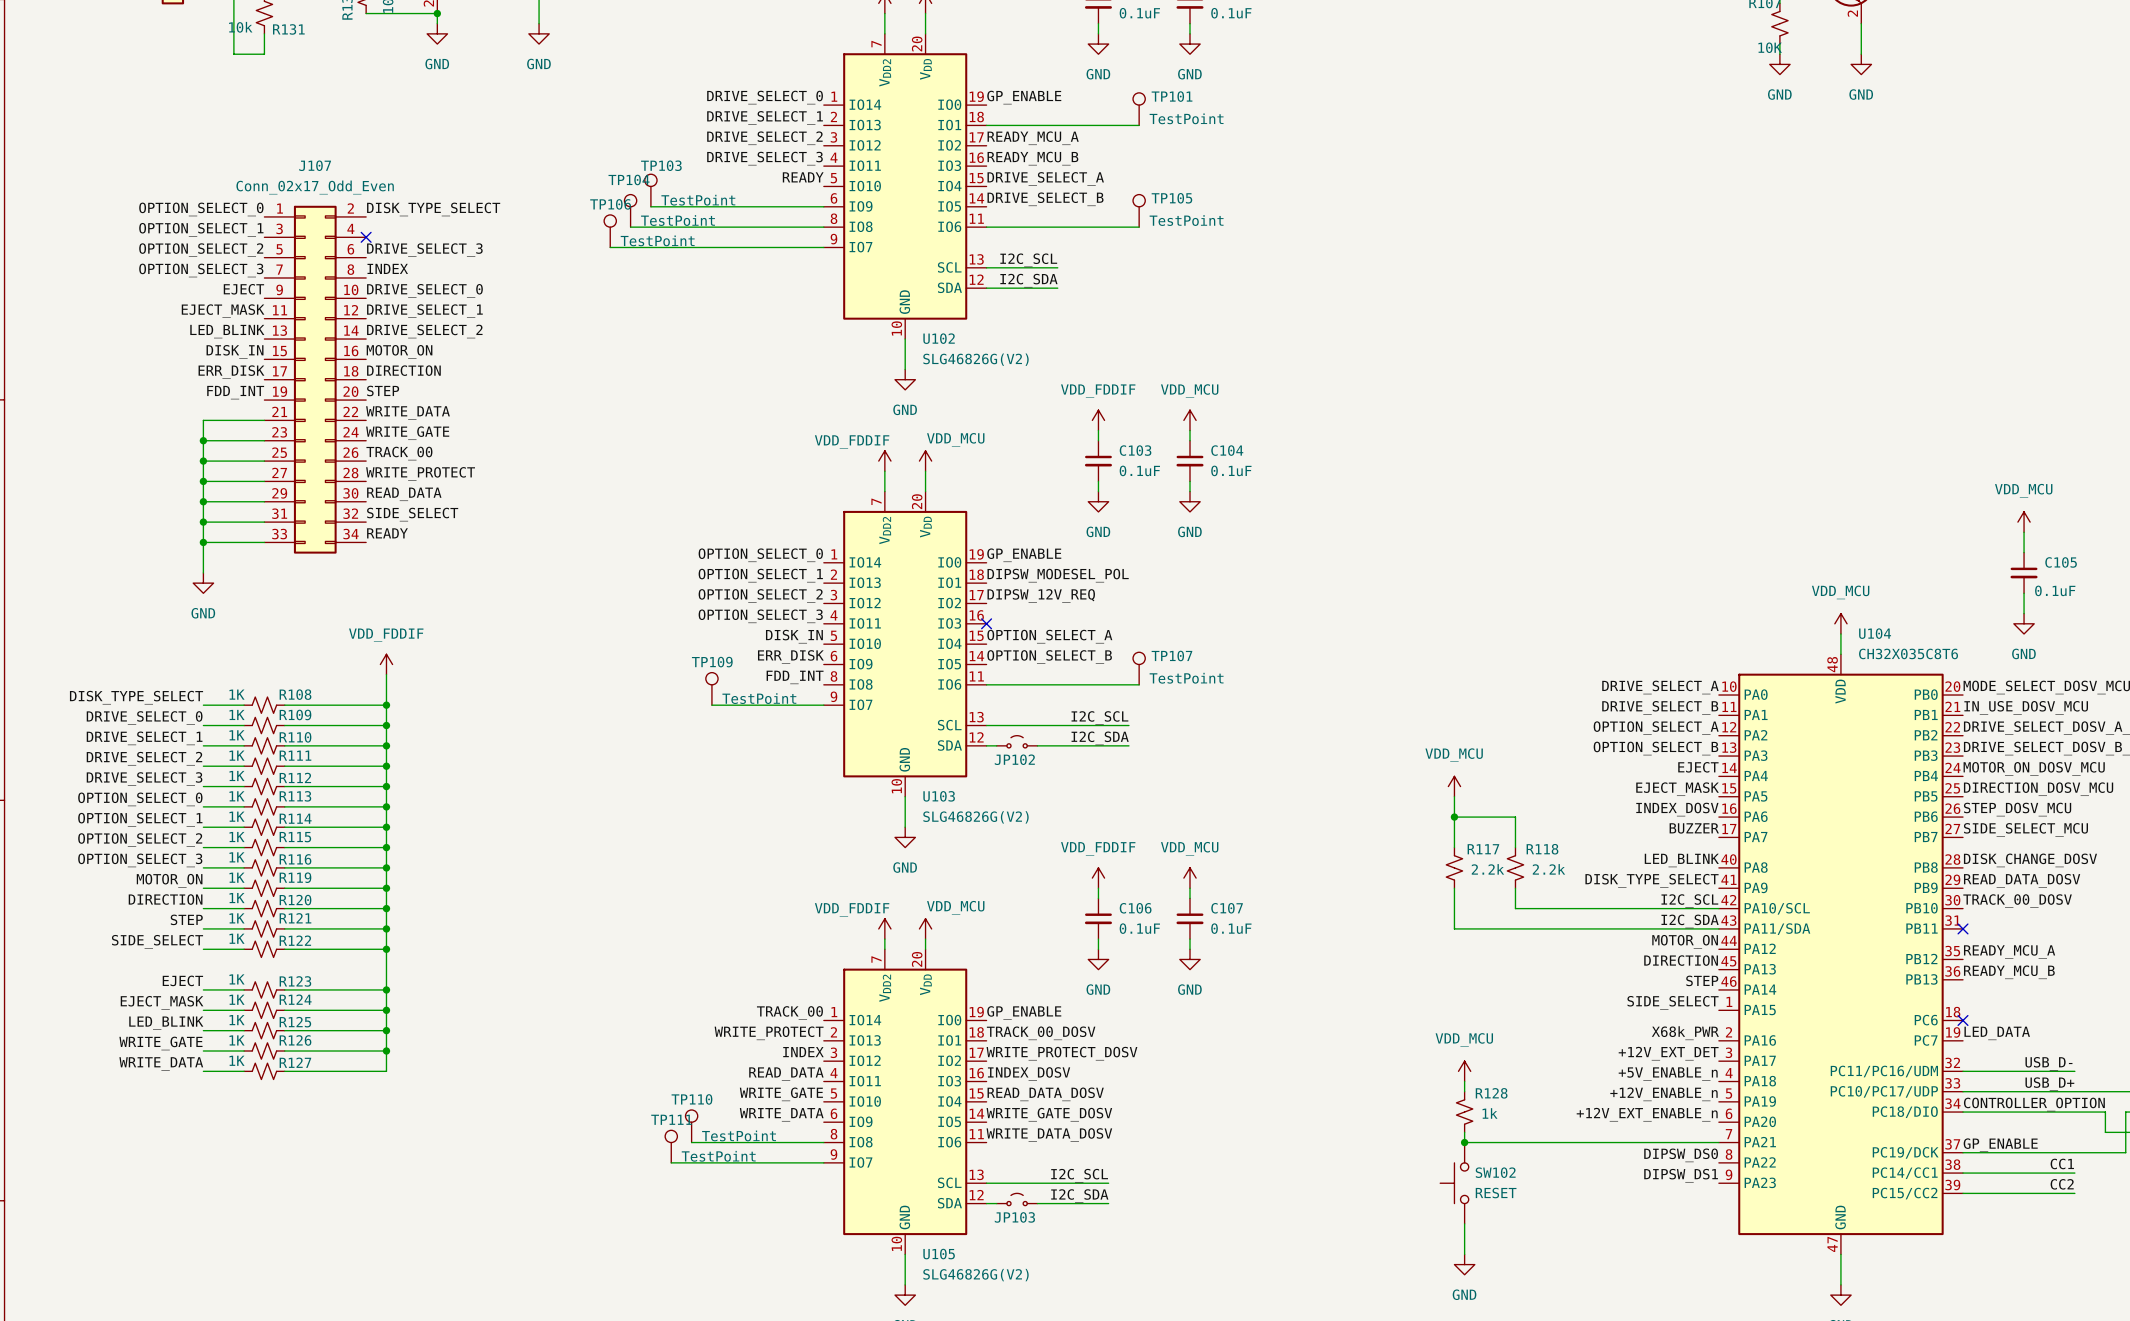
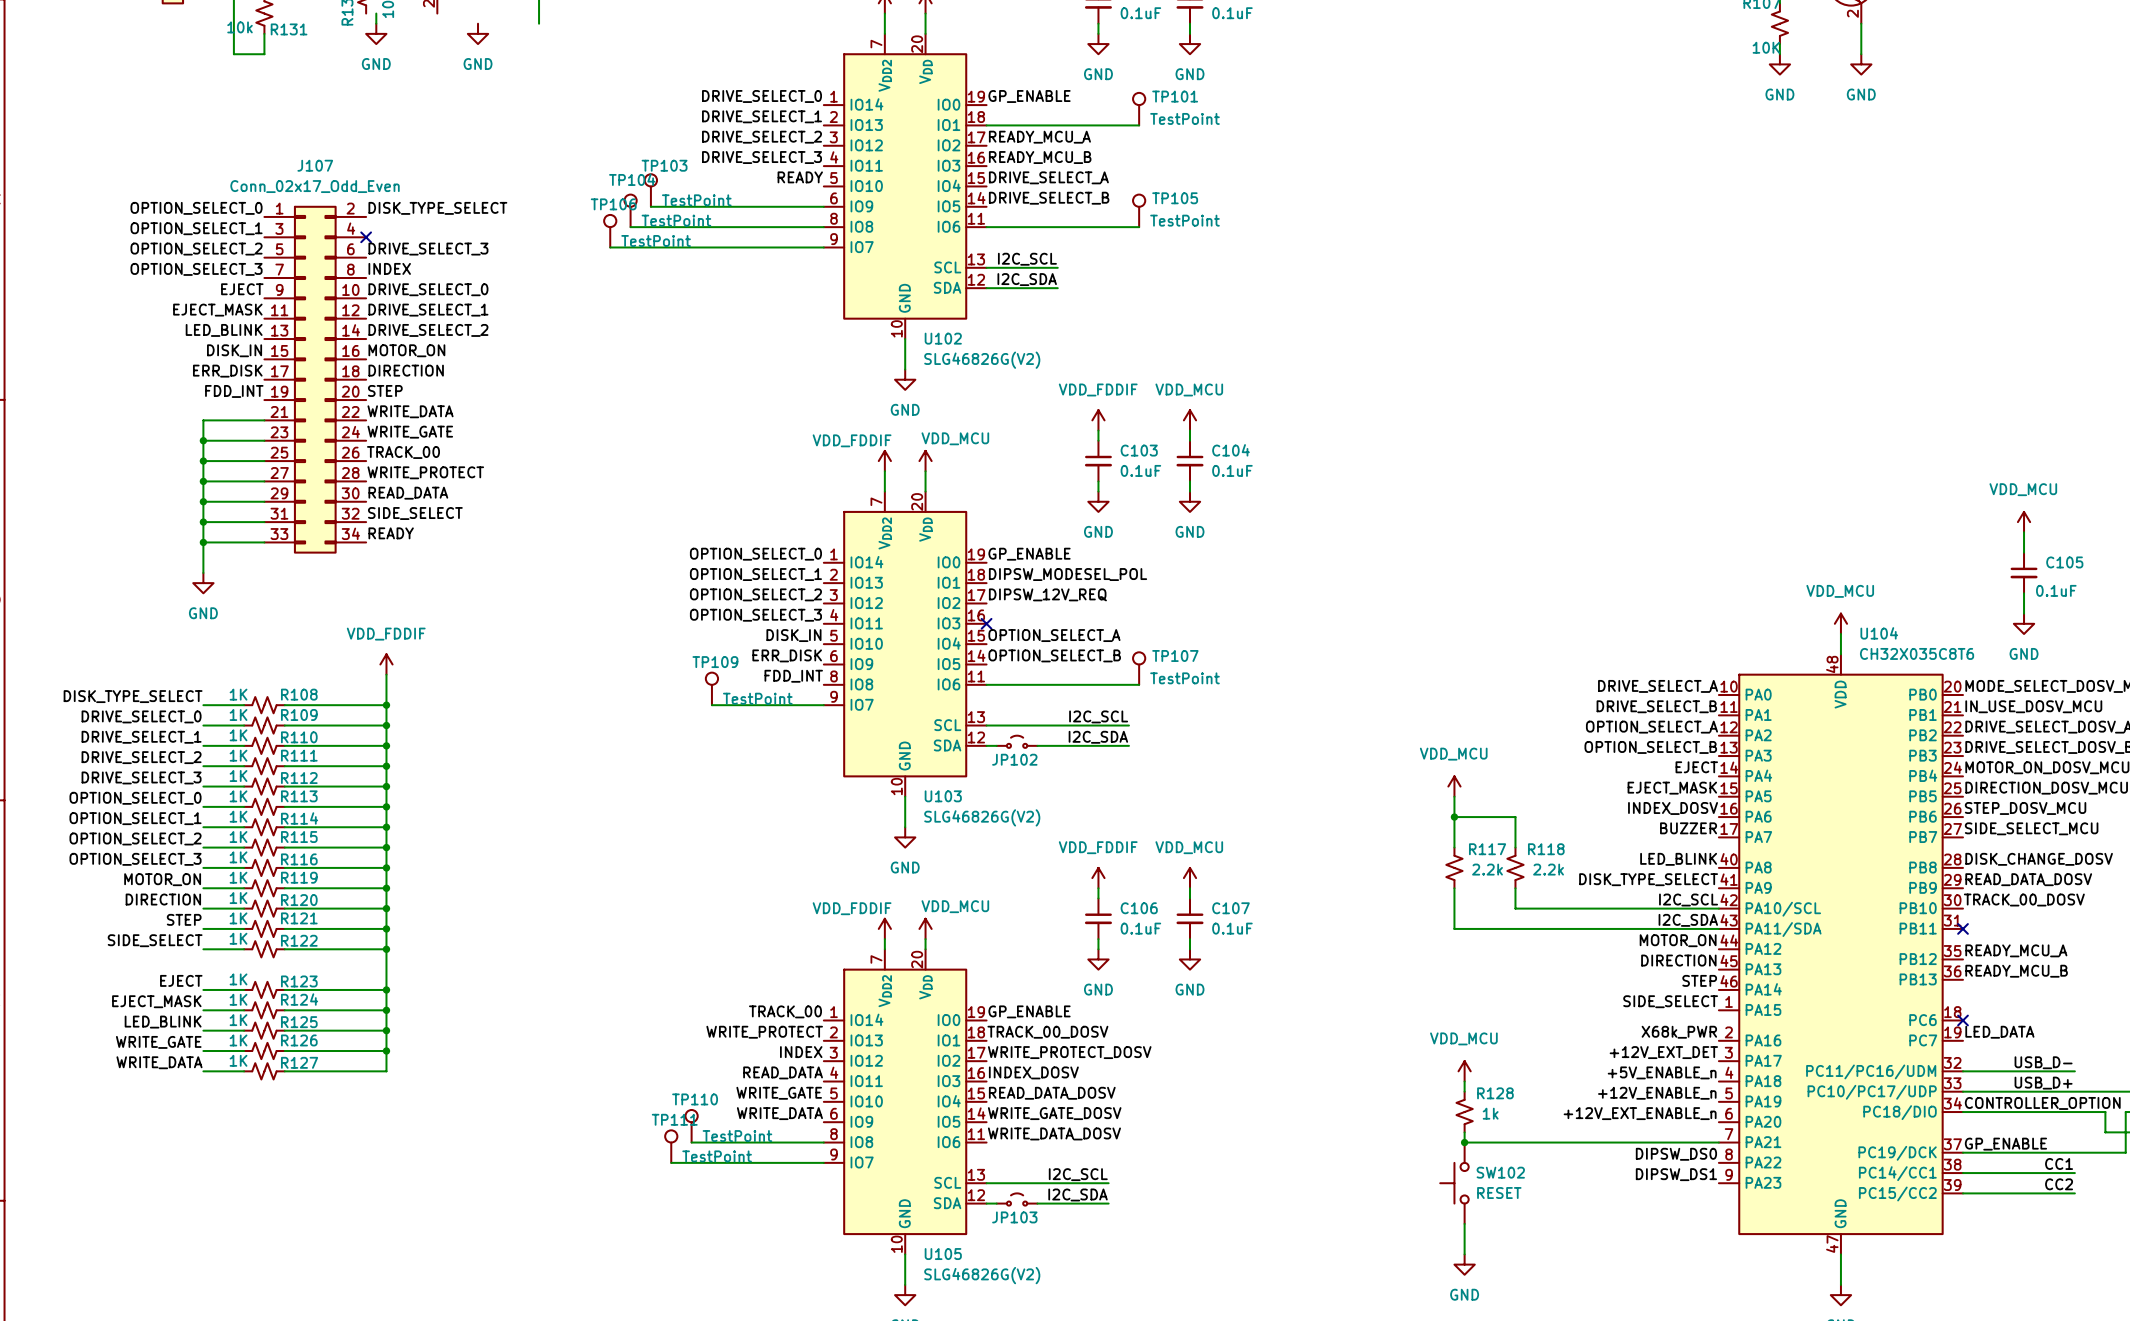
wire: (366, 13) (437, 13) (437, 23) -> none
wire: none -> (376, 13) (376, 23)
junction: (437, 13) -> none
power symbol: none -> GND (376, 33)
power symbol: GND (437, 33) -> none
power symbol: none -> GND (478, 33)
power symbol: GND (539, 33) -> none

